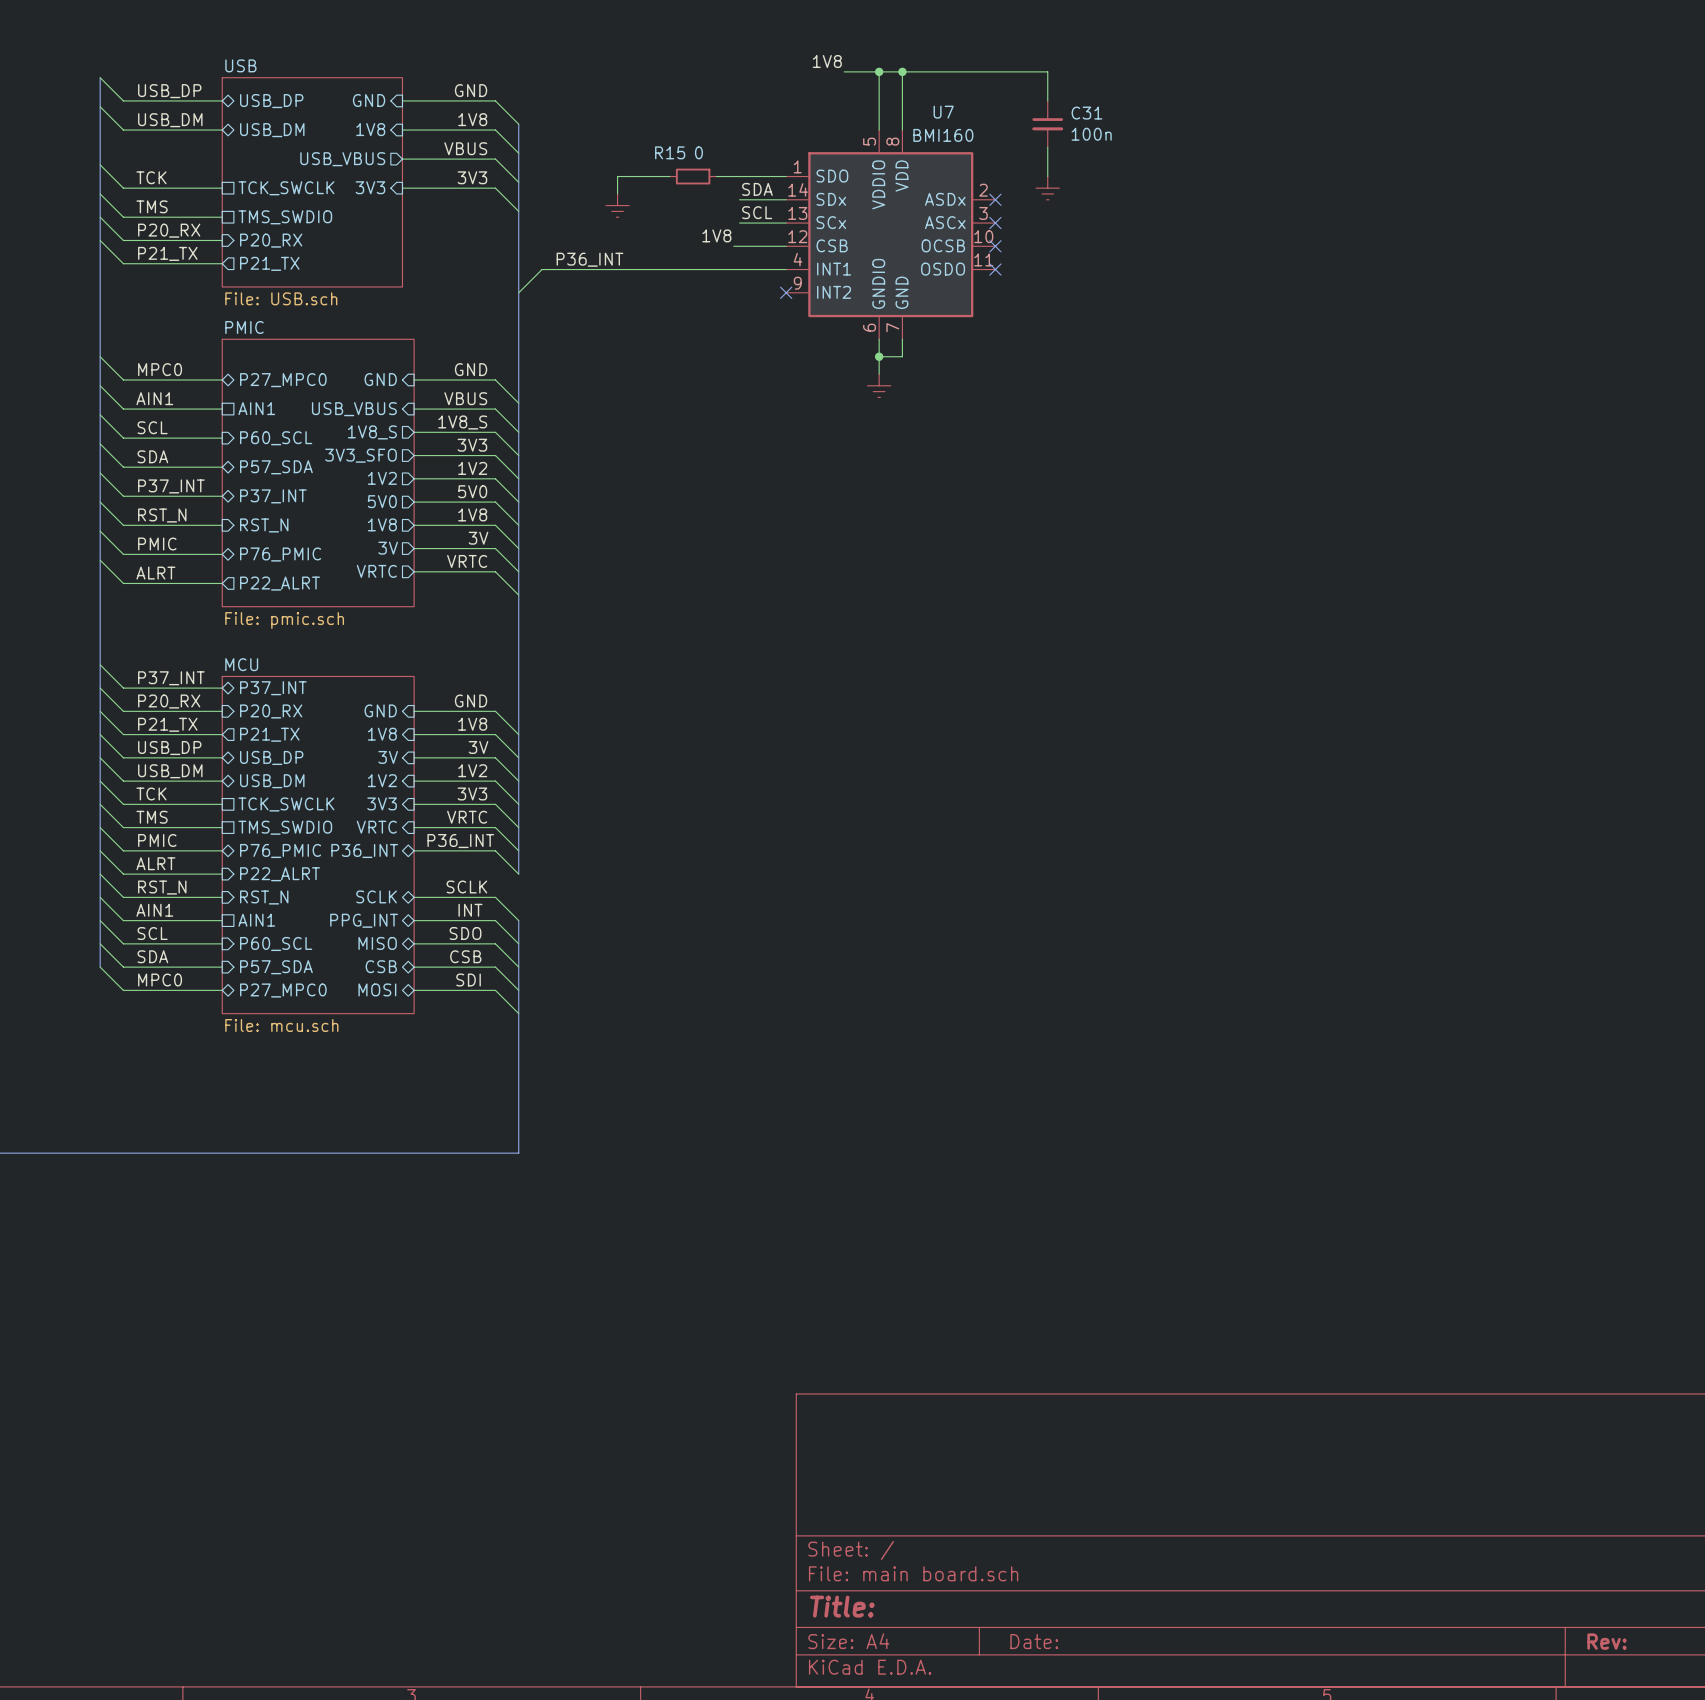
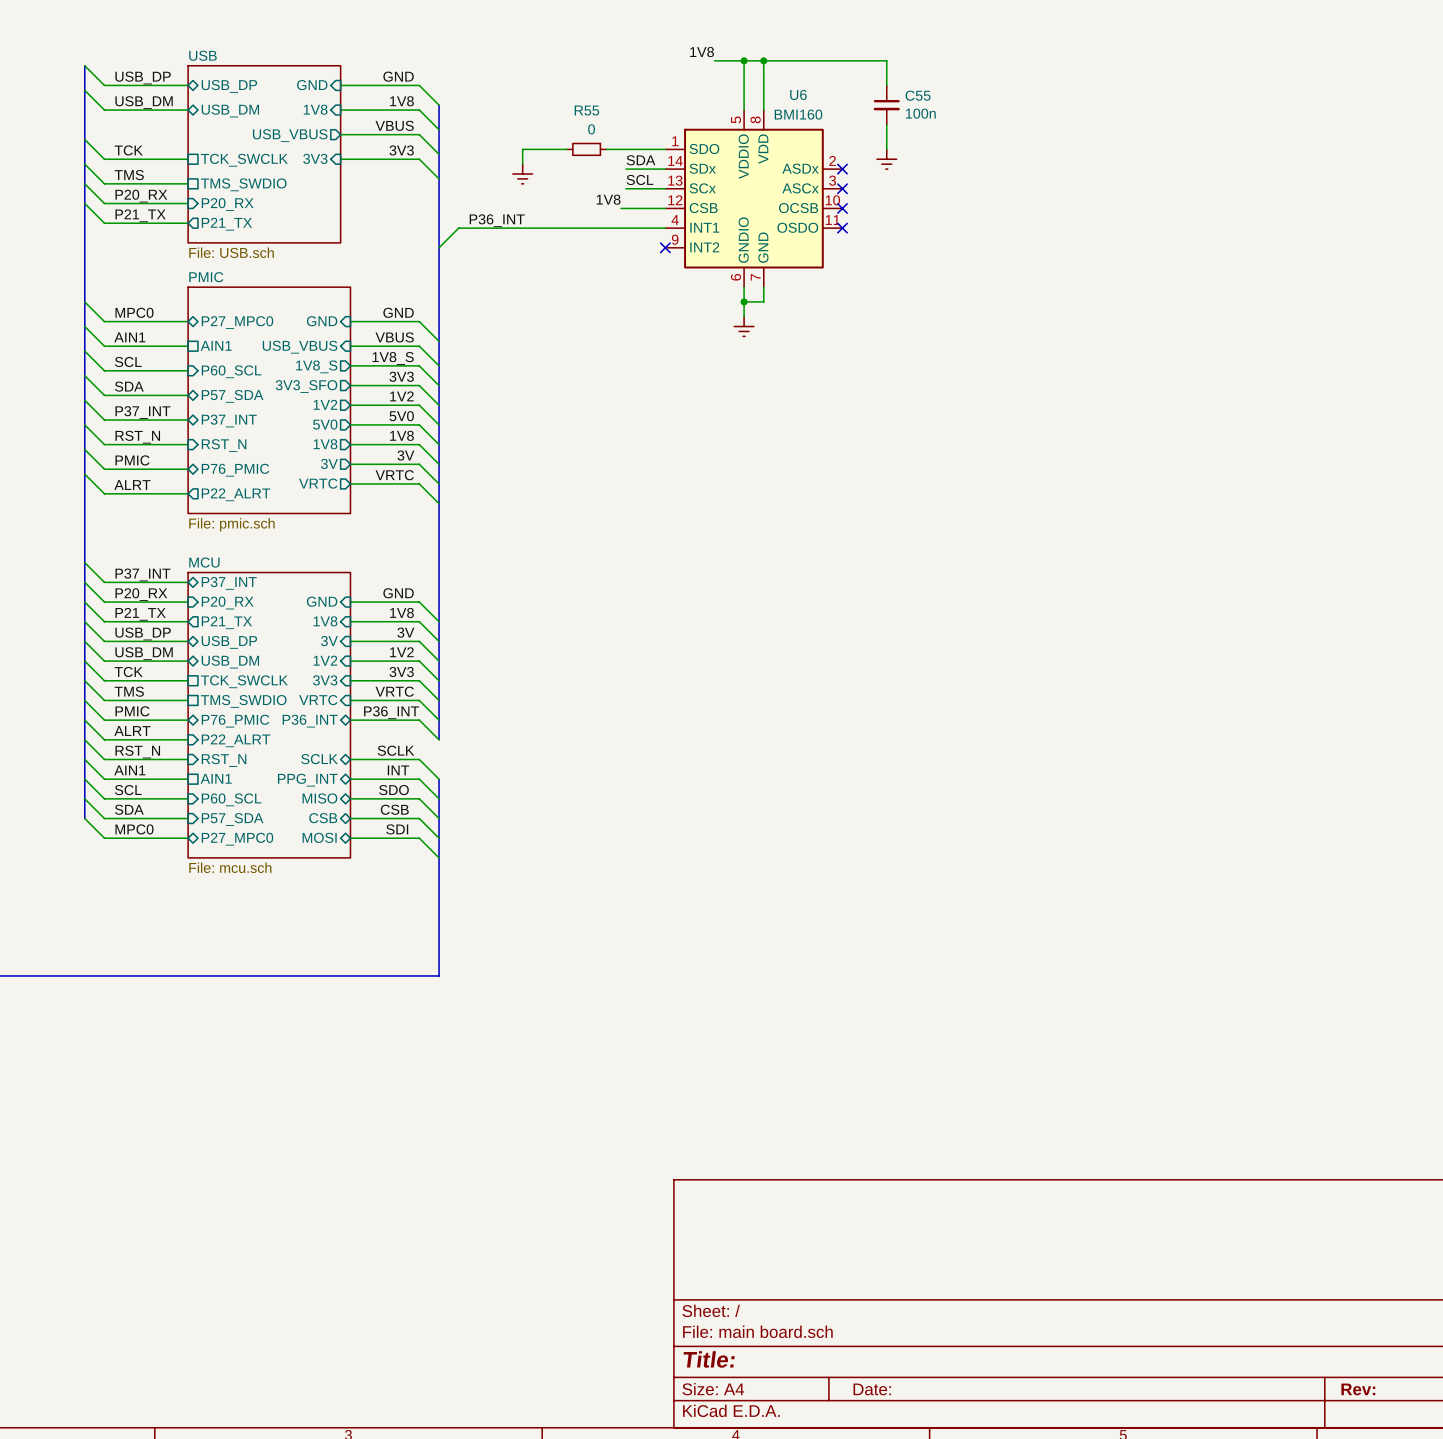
U7 name: U7 (943, 112) -> U6 (798, 94)
C31 name: C31 (1086, 113) -> C55 (918, 95)
R15 name: R15 (670, 152) -> R55 (586, 110)

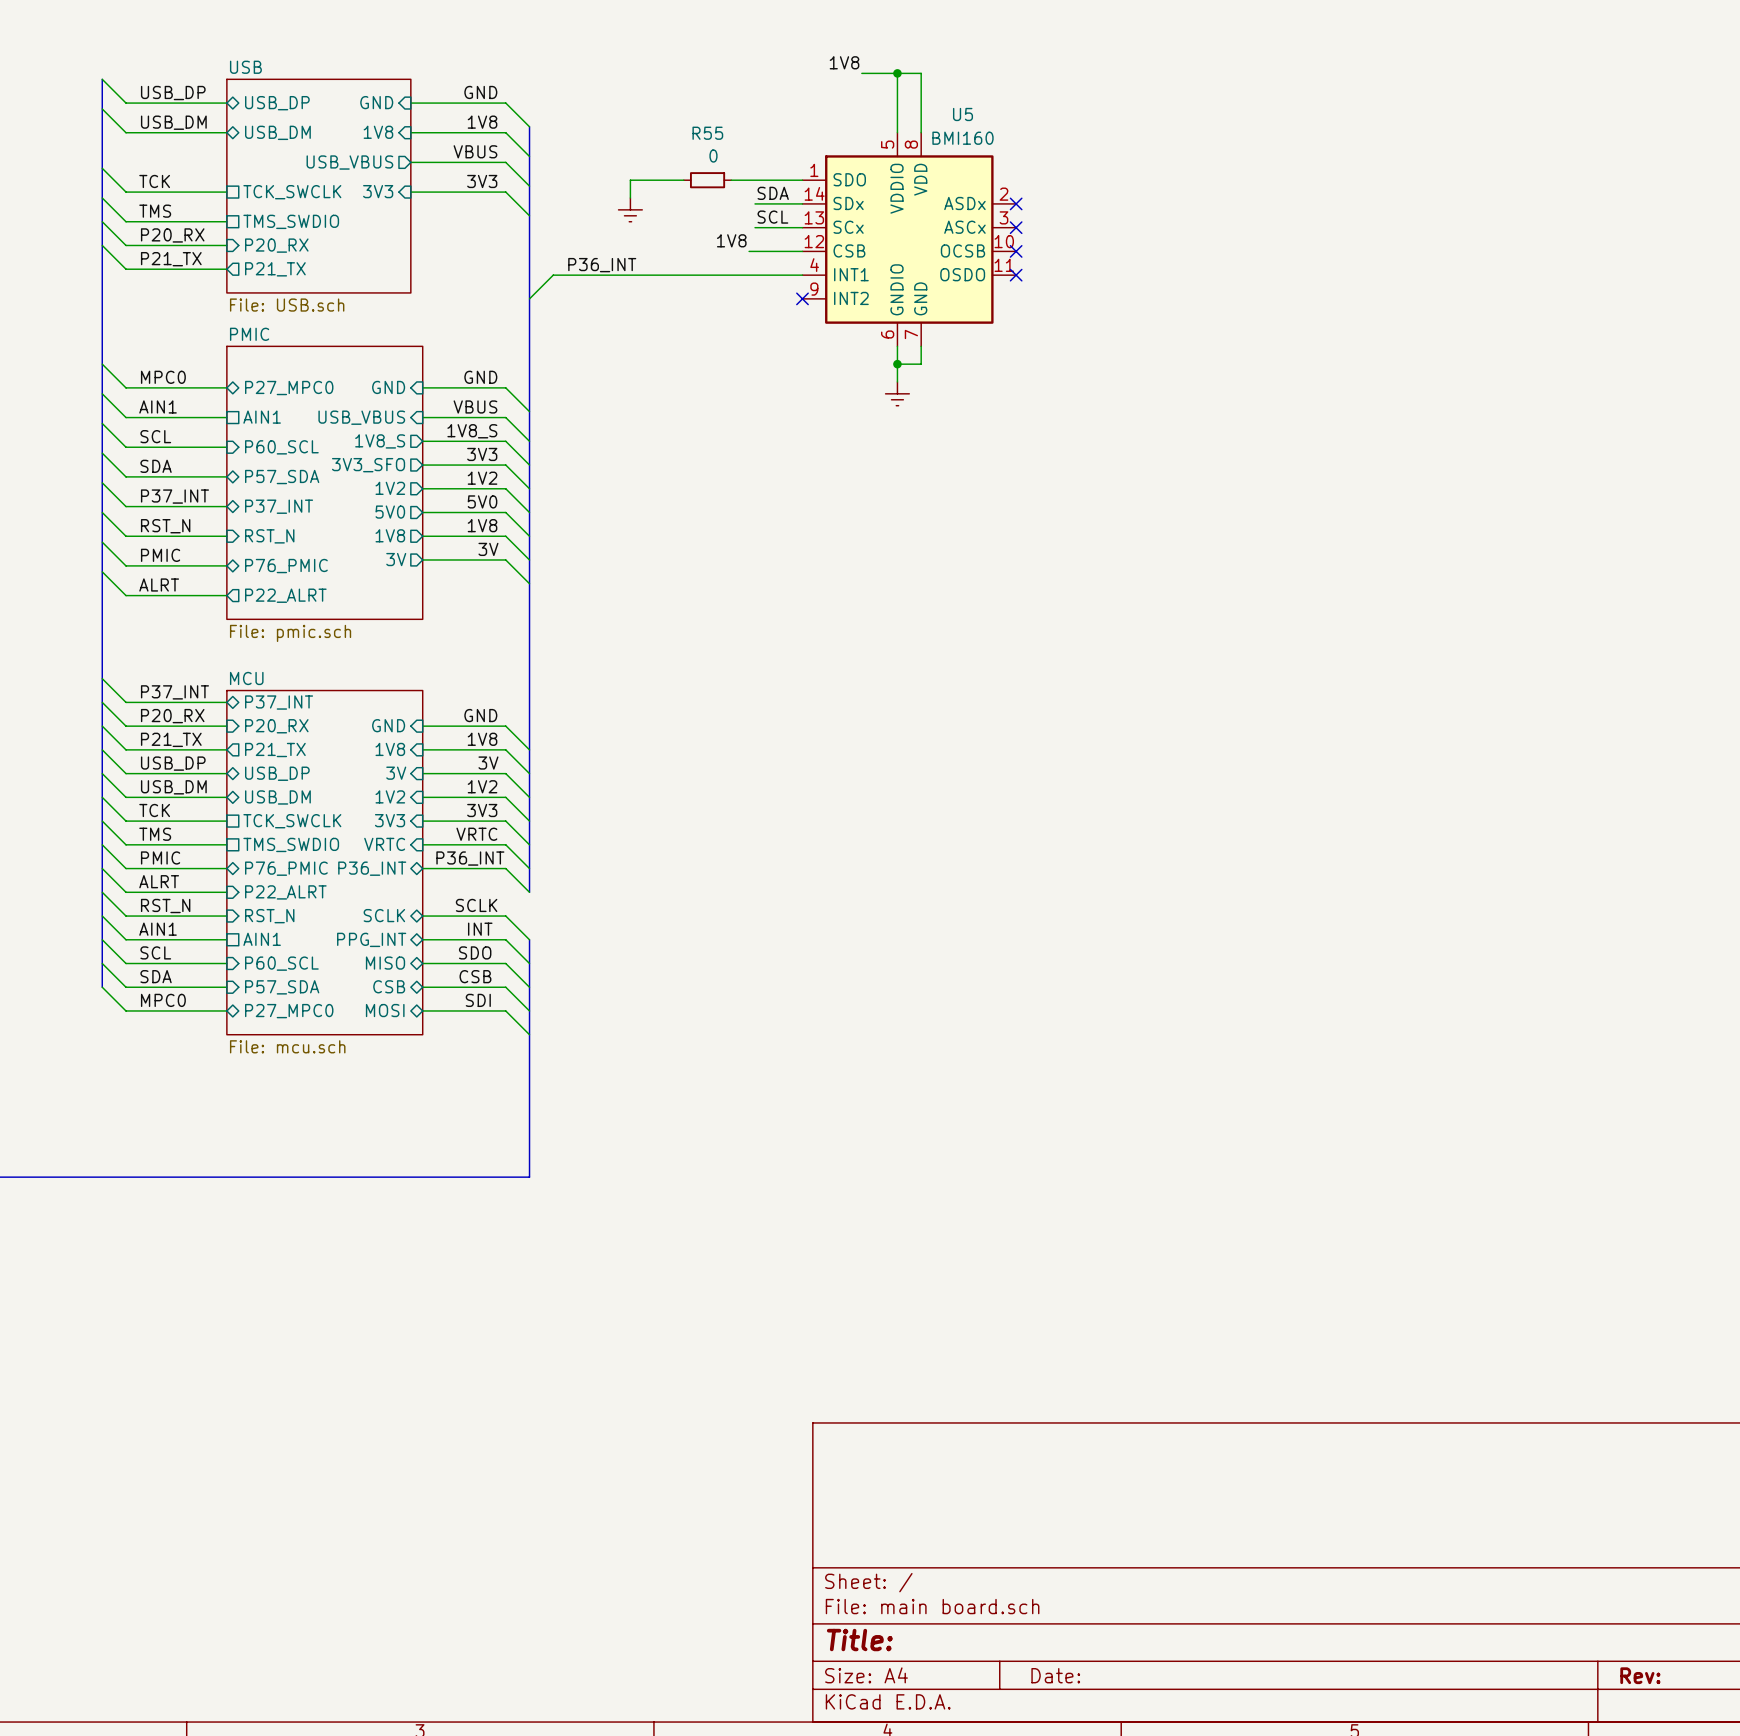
wire: (763, 60) (886, 60) (886, 85) -> none
junction: (763, 60) -> none
U6 name: U6 (798, 94) -> U5 (963, 114)
C55: 100n (886, 105) -> none
wire: (886, 124) (886, 149) -> none
power symbol: (886, 159) -> none
label: VRTC (394, 475) -> none
sheet pin: VRTC (318, 483) -> none
wire: (350, 483) (419, 483) (439, 503) -> none

